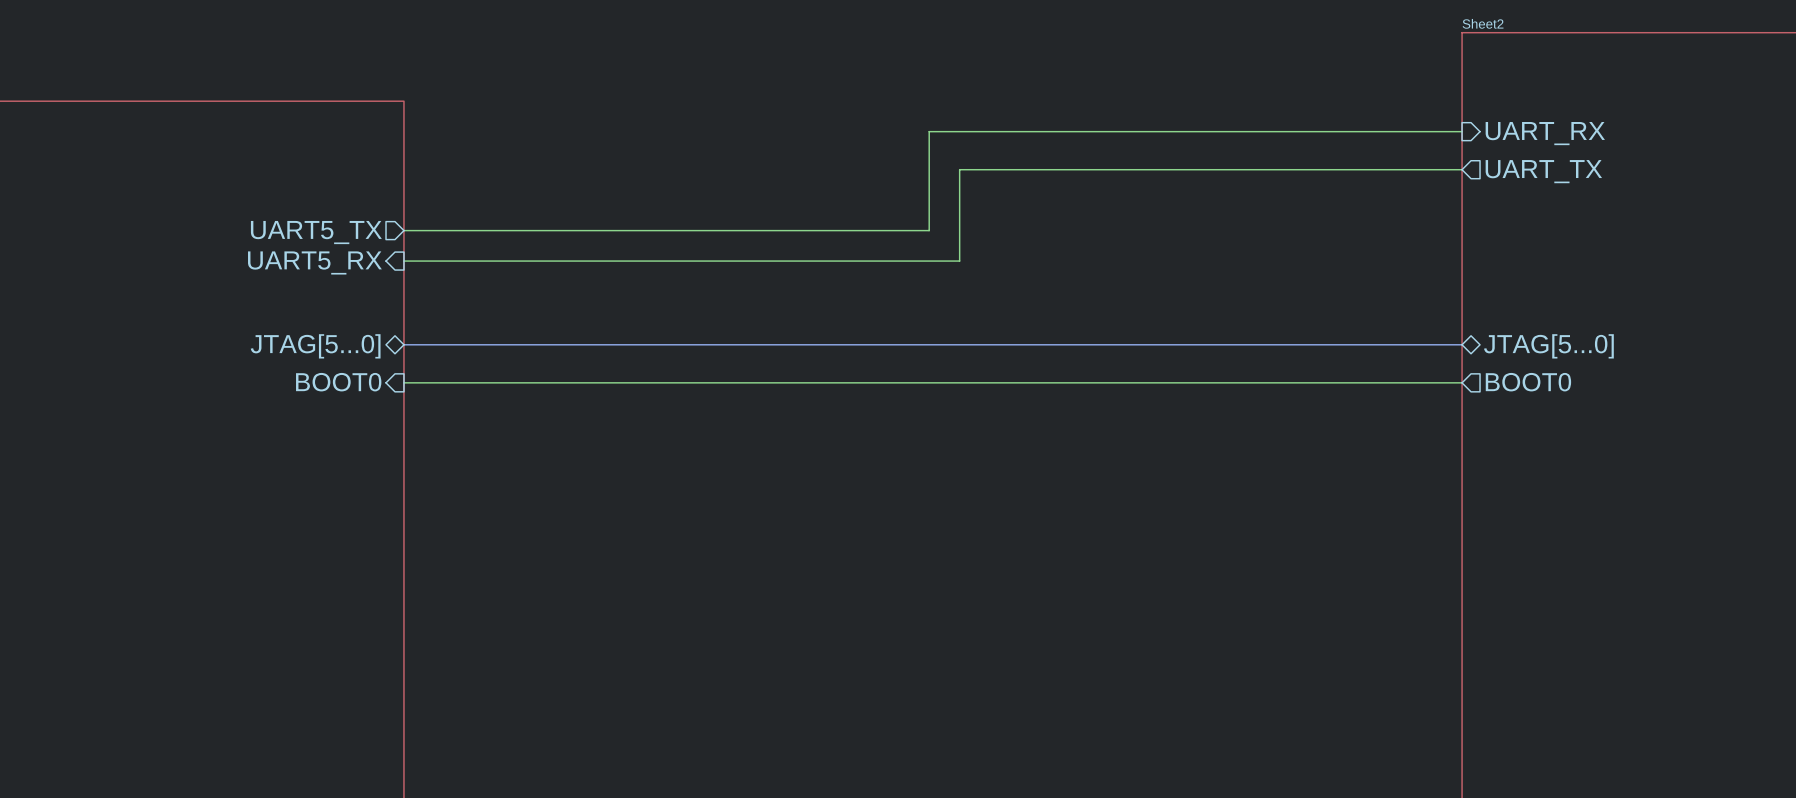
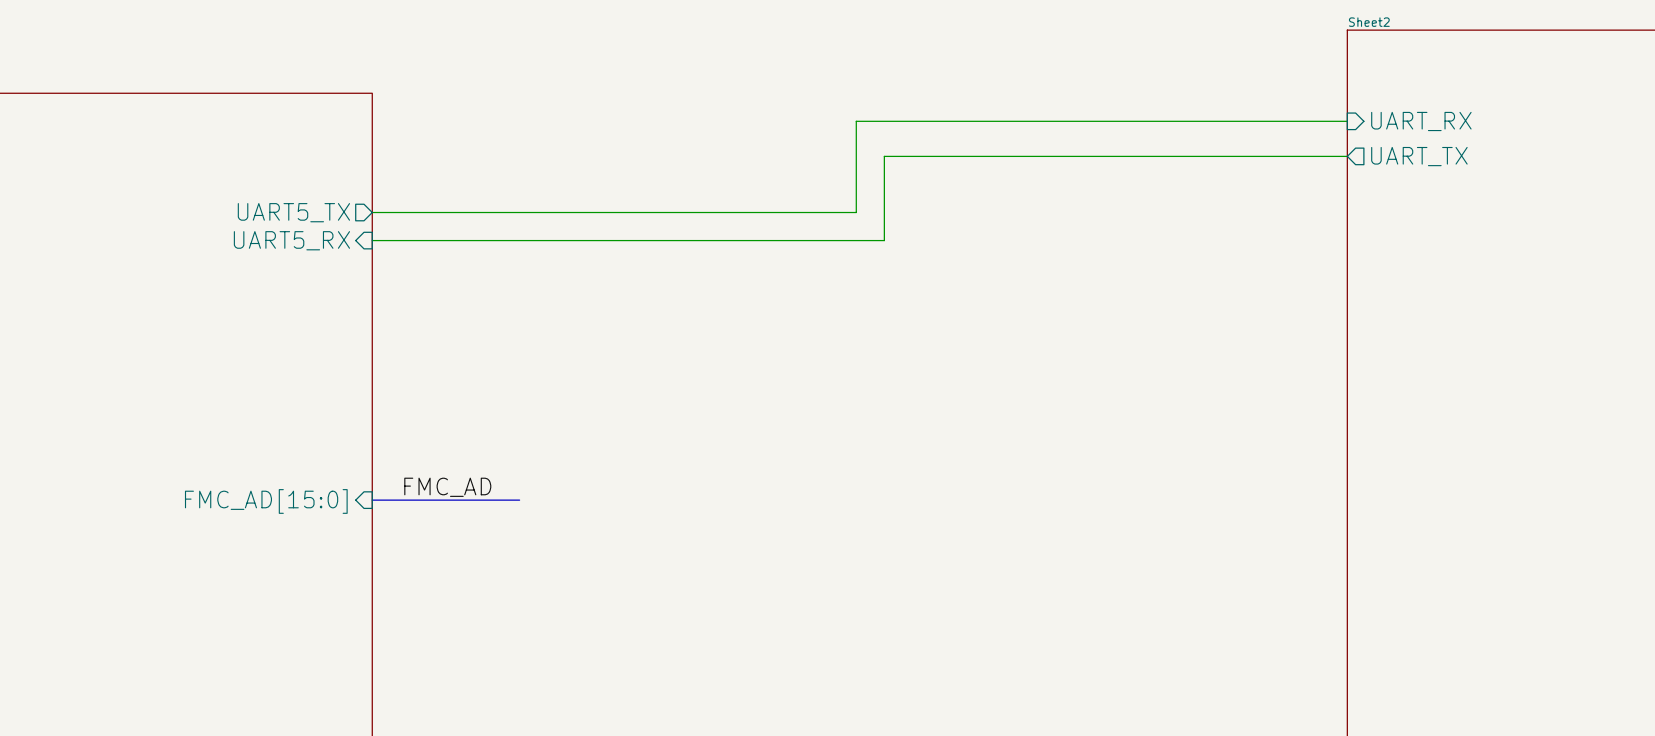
bus: (403, 344) (1462, 344) -> none
sheet pin: JTAG[5...0] (315, 346) -> none
sheet pin: JTAG[5...0] (1548, 346) -> none
sheet pin: BOOT0 (338, 382) -> none
wire: (403, 382) (1462, 382) -> none
sheet pin: BOOT0 (1528, 382) -> none
label: none -> FMC_AD (447, 487)
bus: none -> (372, 500) (519, 500)
sheet pin: none -> FMC_AD[15:0] (266, 501)

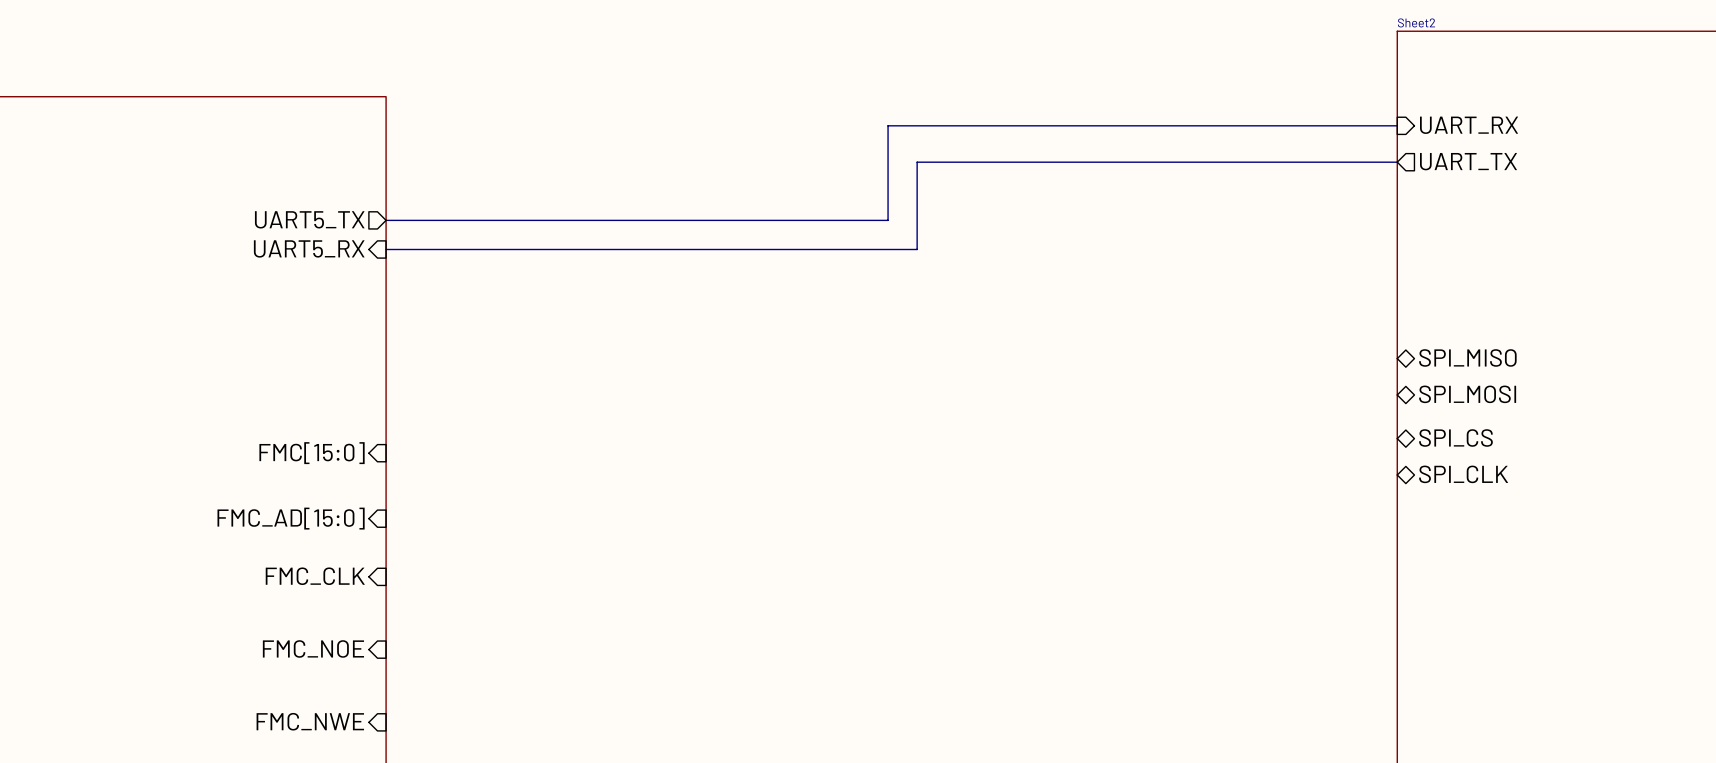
sheet pin: none -> SPI_MISO (1467, 357)
sheet pin: none -> SPI_MOSI (1467, 394)
sheet pin: none -> SPI_CS (1456, 438)
sheet pin: none -> FMC[15:0] (312, 453)
sheet pin: none -> SPI_CLK (1463, 474)
label: FMC_AD (447, 487) -> none
bus: (372, 500) (519, 500) -> none
sheet pin: none -> FMC_CLK (315, 576)
sheet pin: none -> FMC_NOE (313, 648)
sheet pin: none -> FMC_NWE (310, 721)

